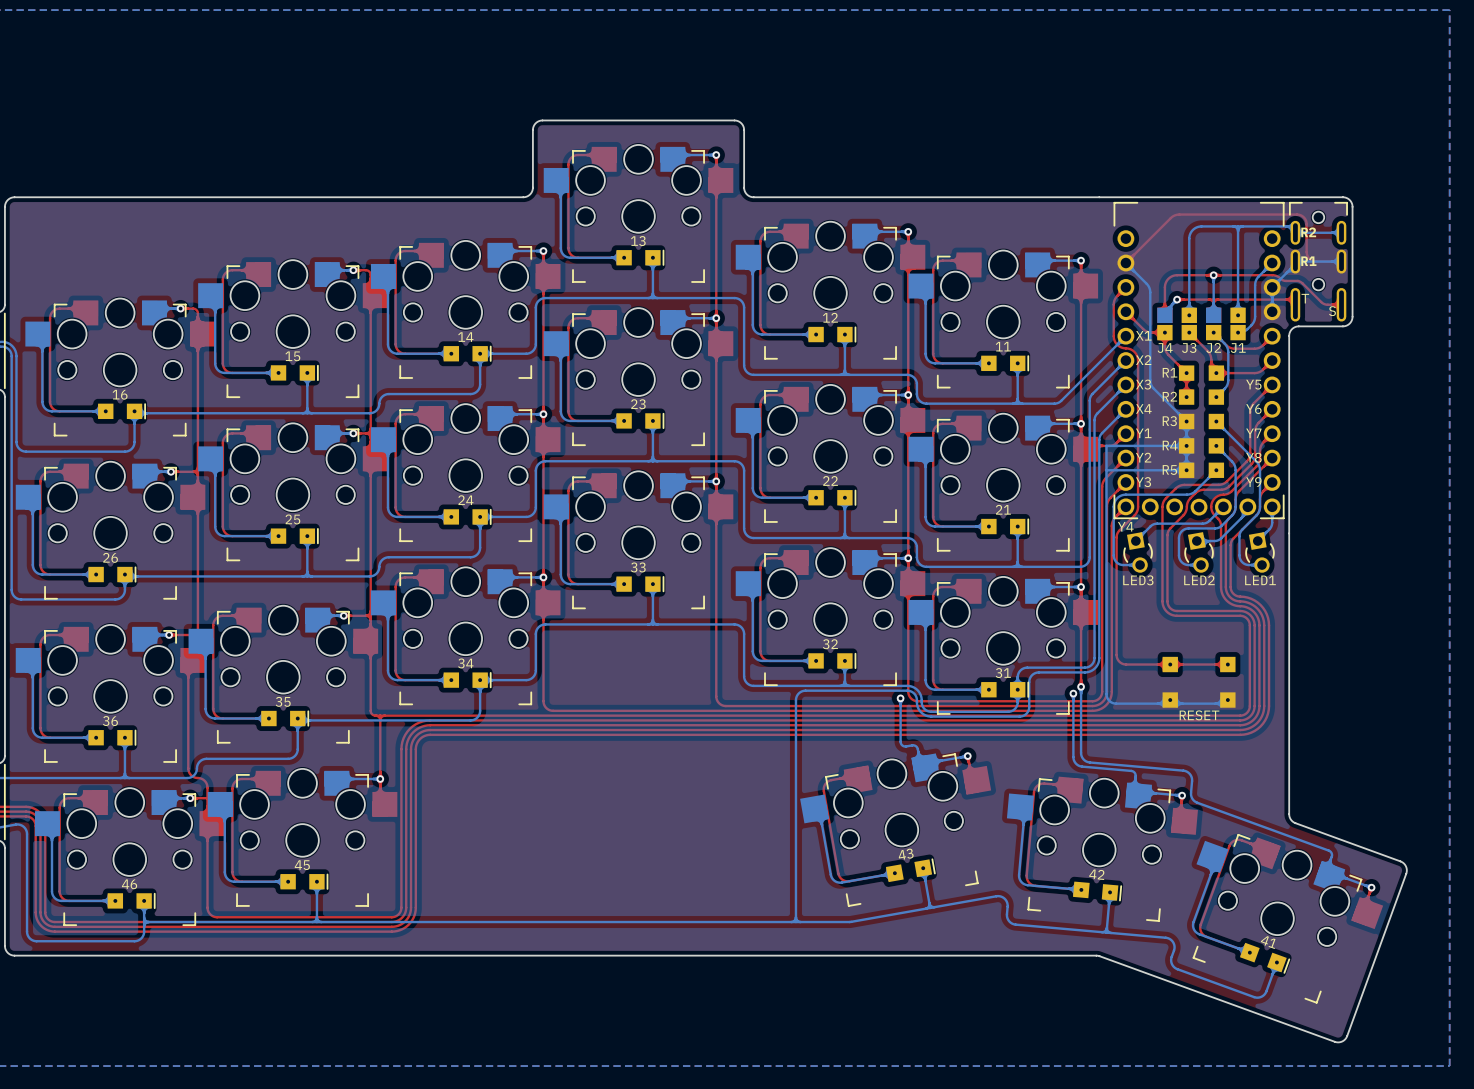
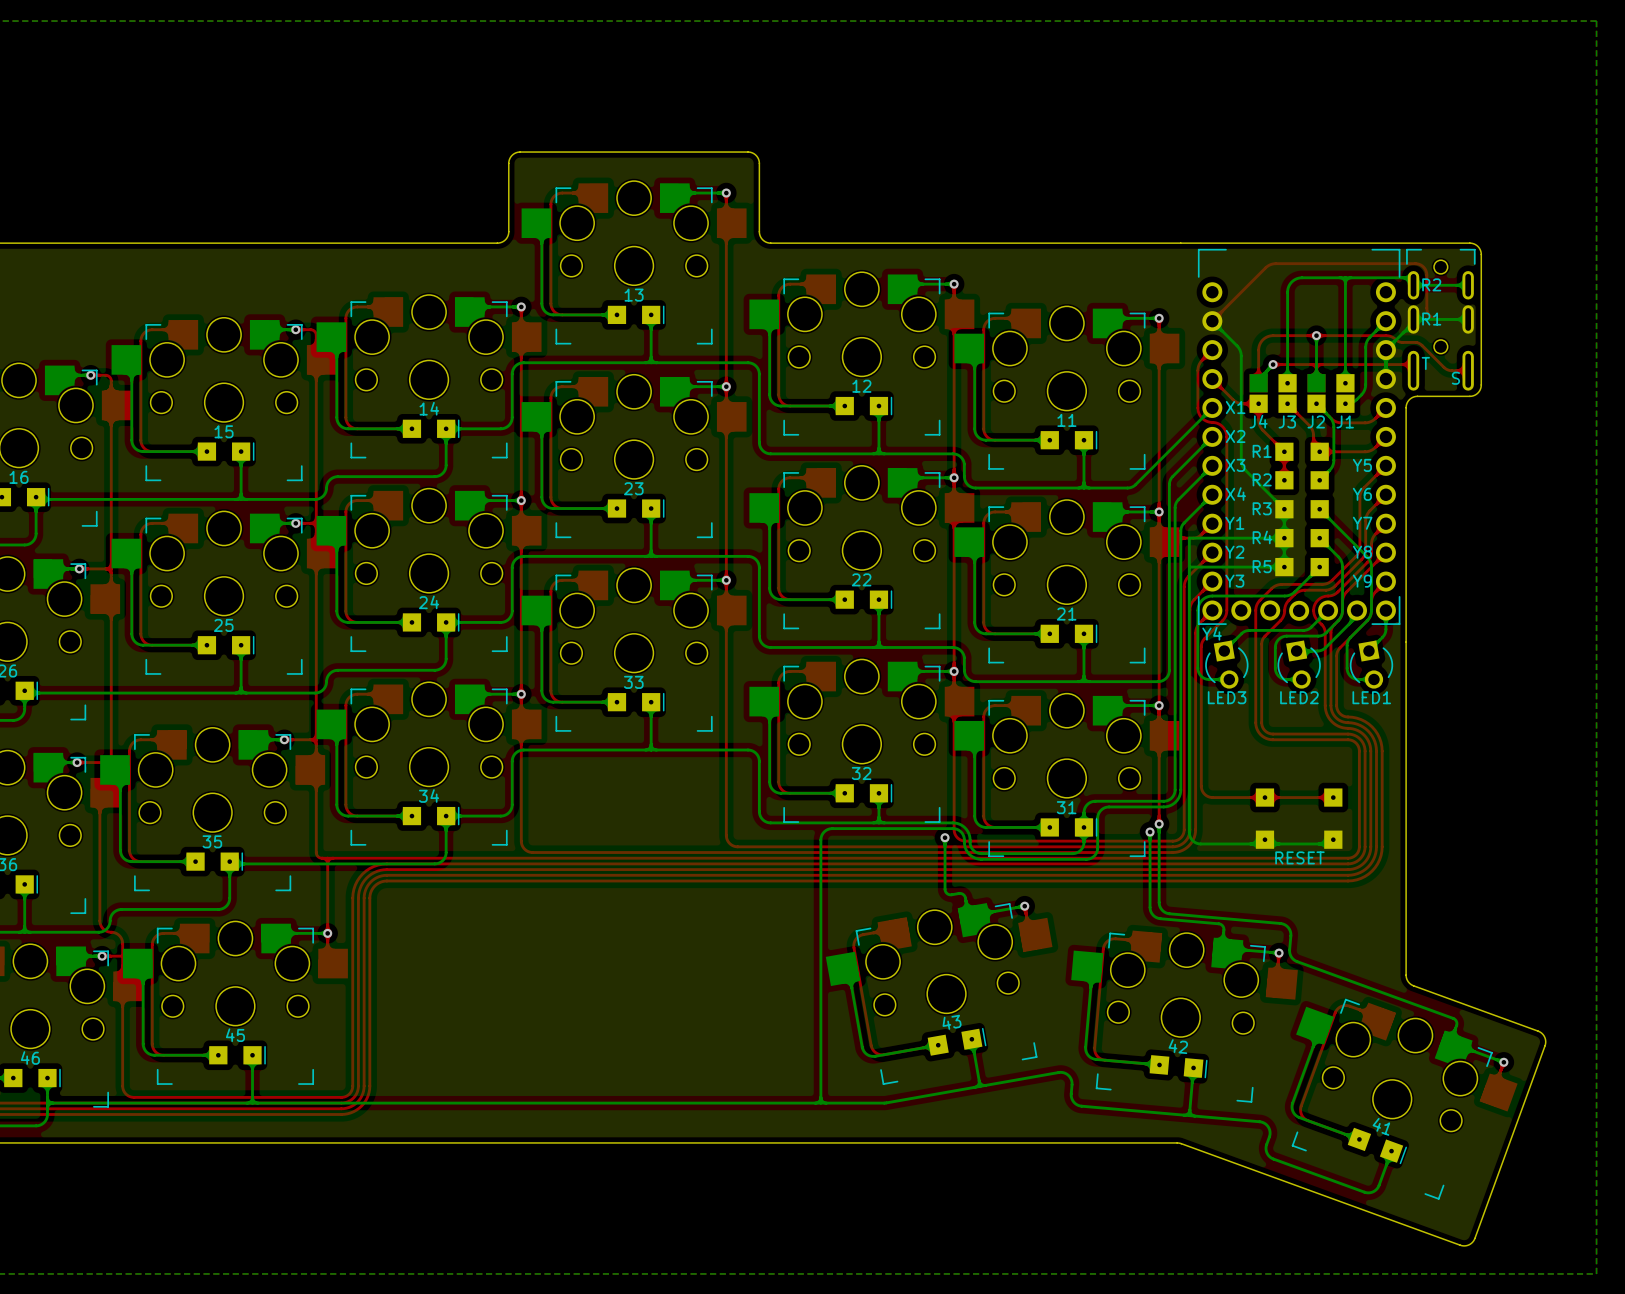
part footprint: [1123, 532, 1153, 573] -> [1205, 640, 1249, 689]
part footprint: [1184, 532, 1214, 573] -> [1277, 640, 1321, 689]
part footprint: [1245, 532, 1275, 573] -> [1349, 640, 1394, 689]

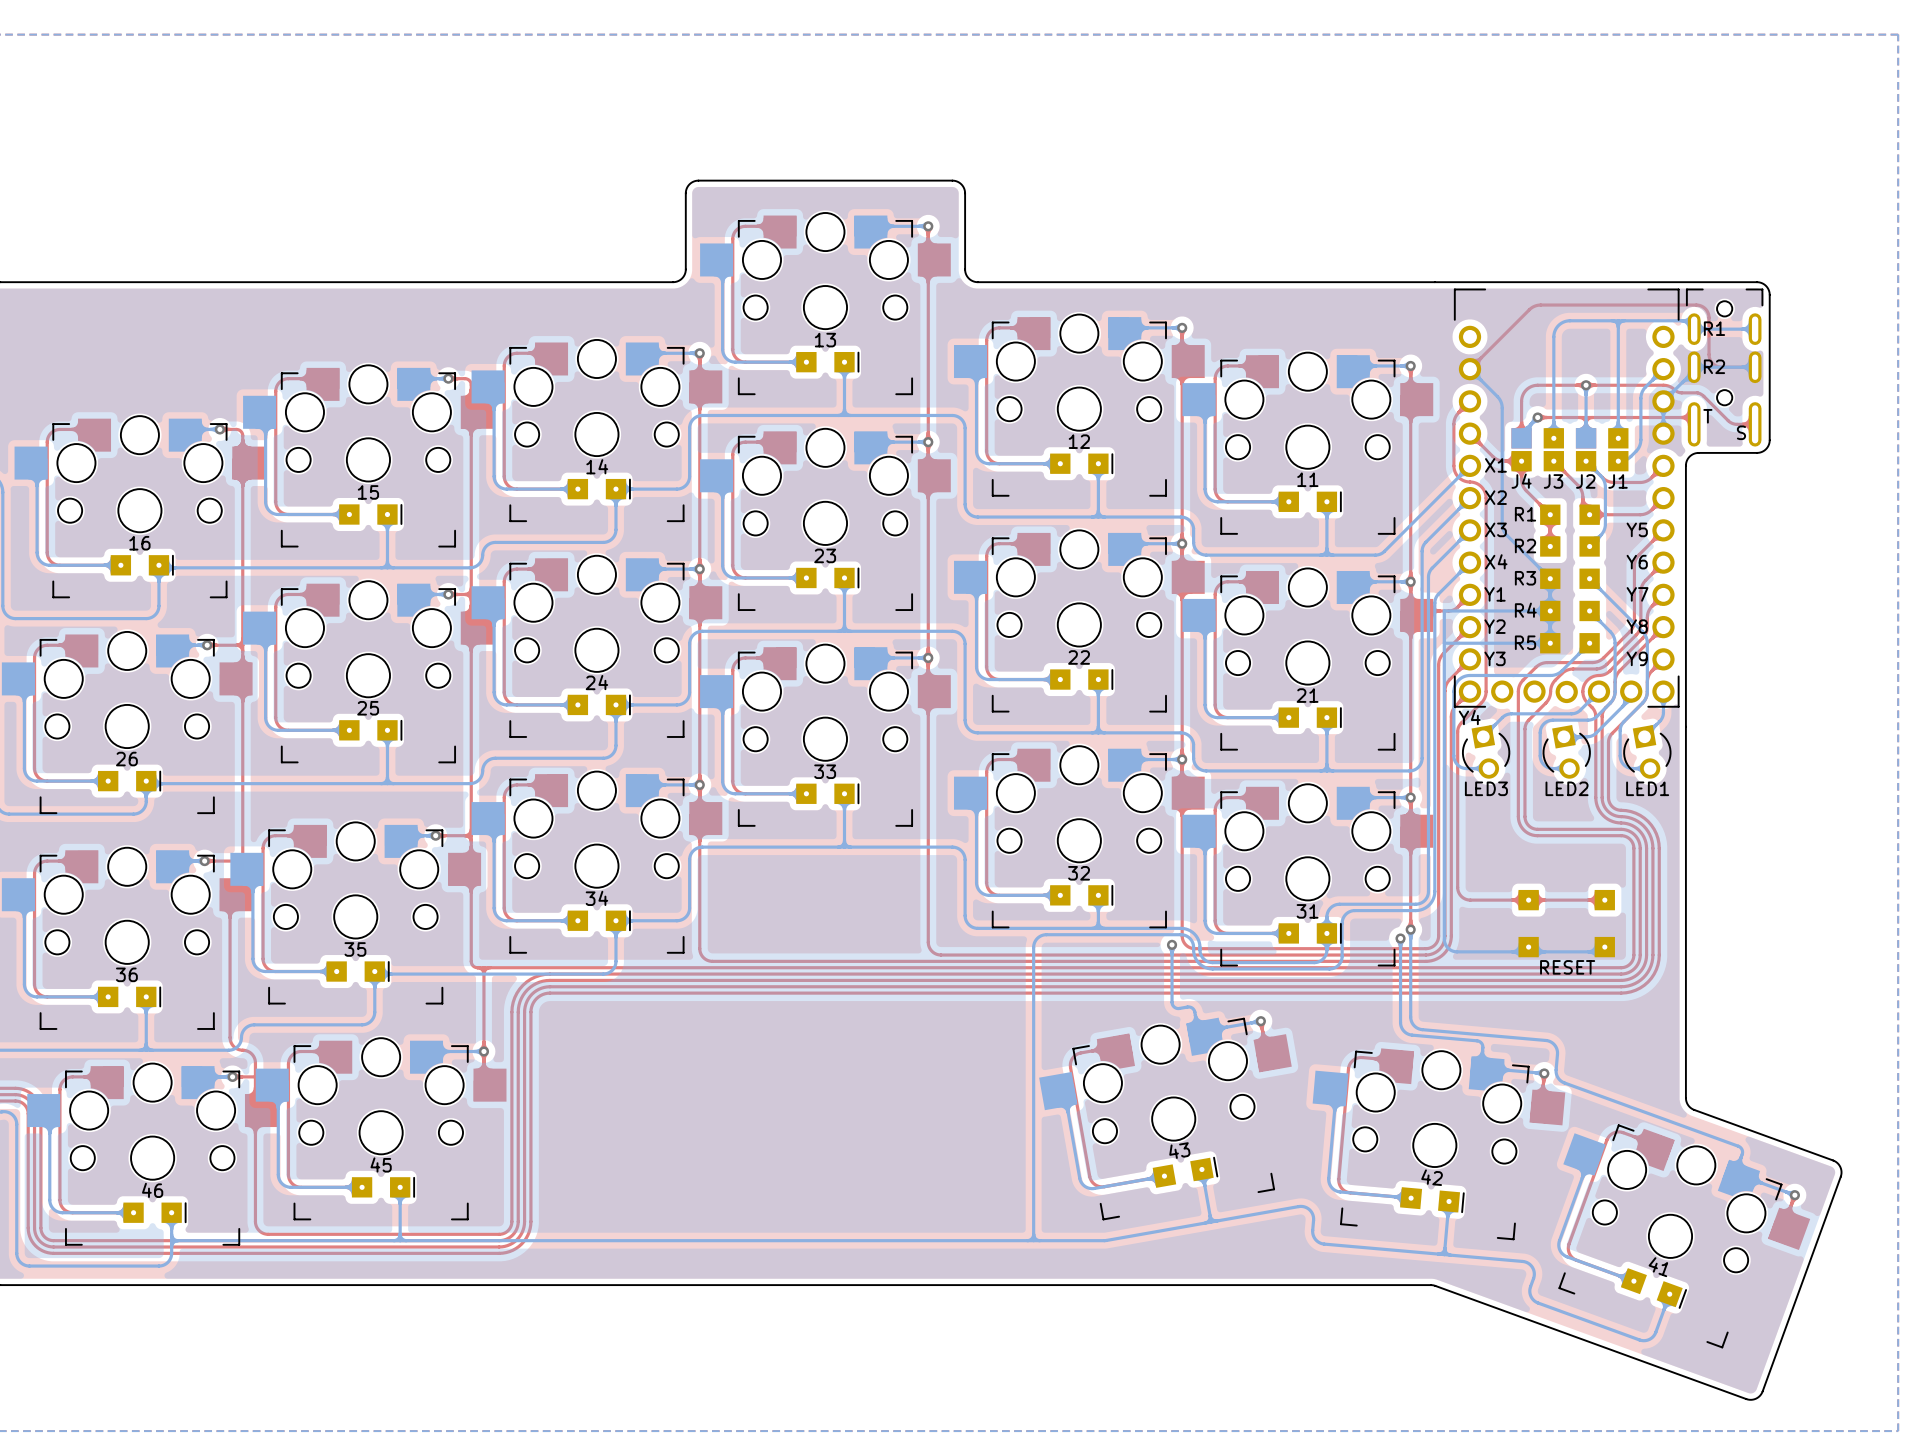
part text: R2 (1431, 284) -> R1 (1714, 328)
part text: R1 (1431, 319) -> R2 (1714, 366)

